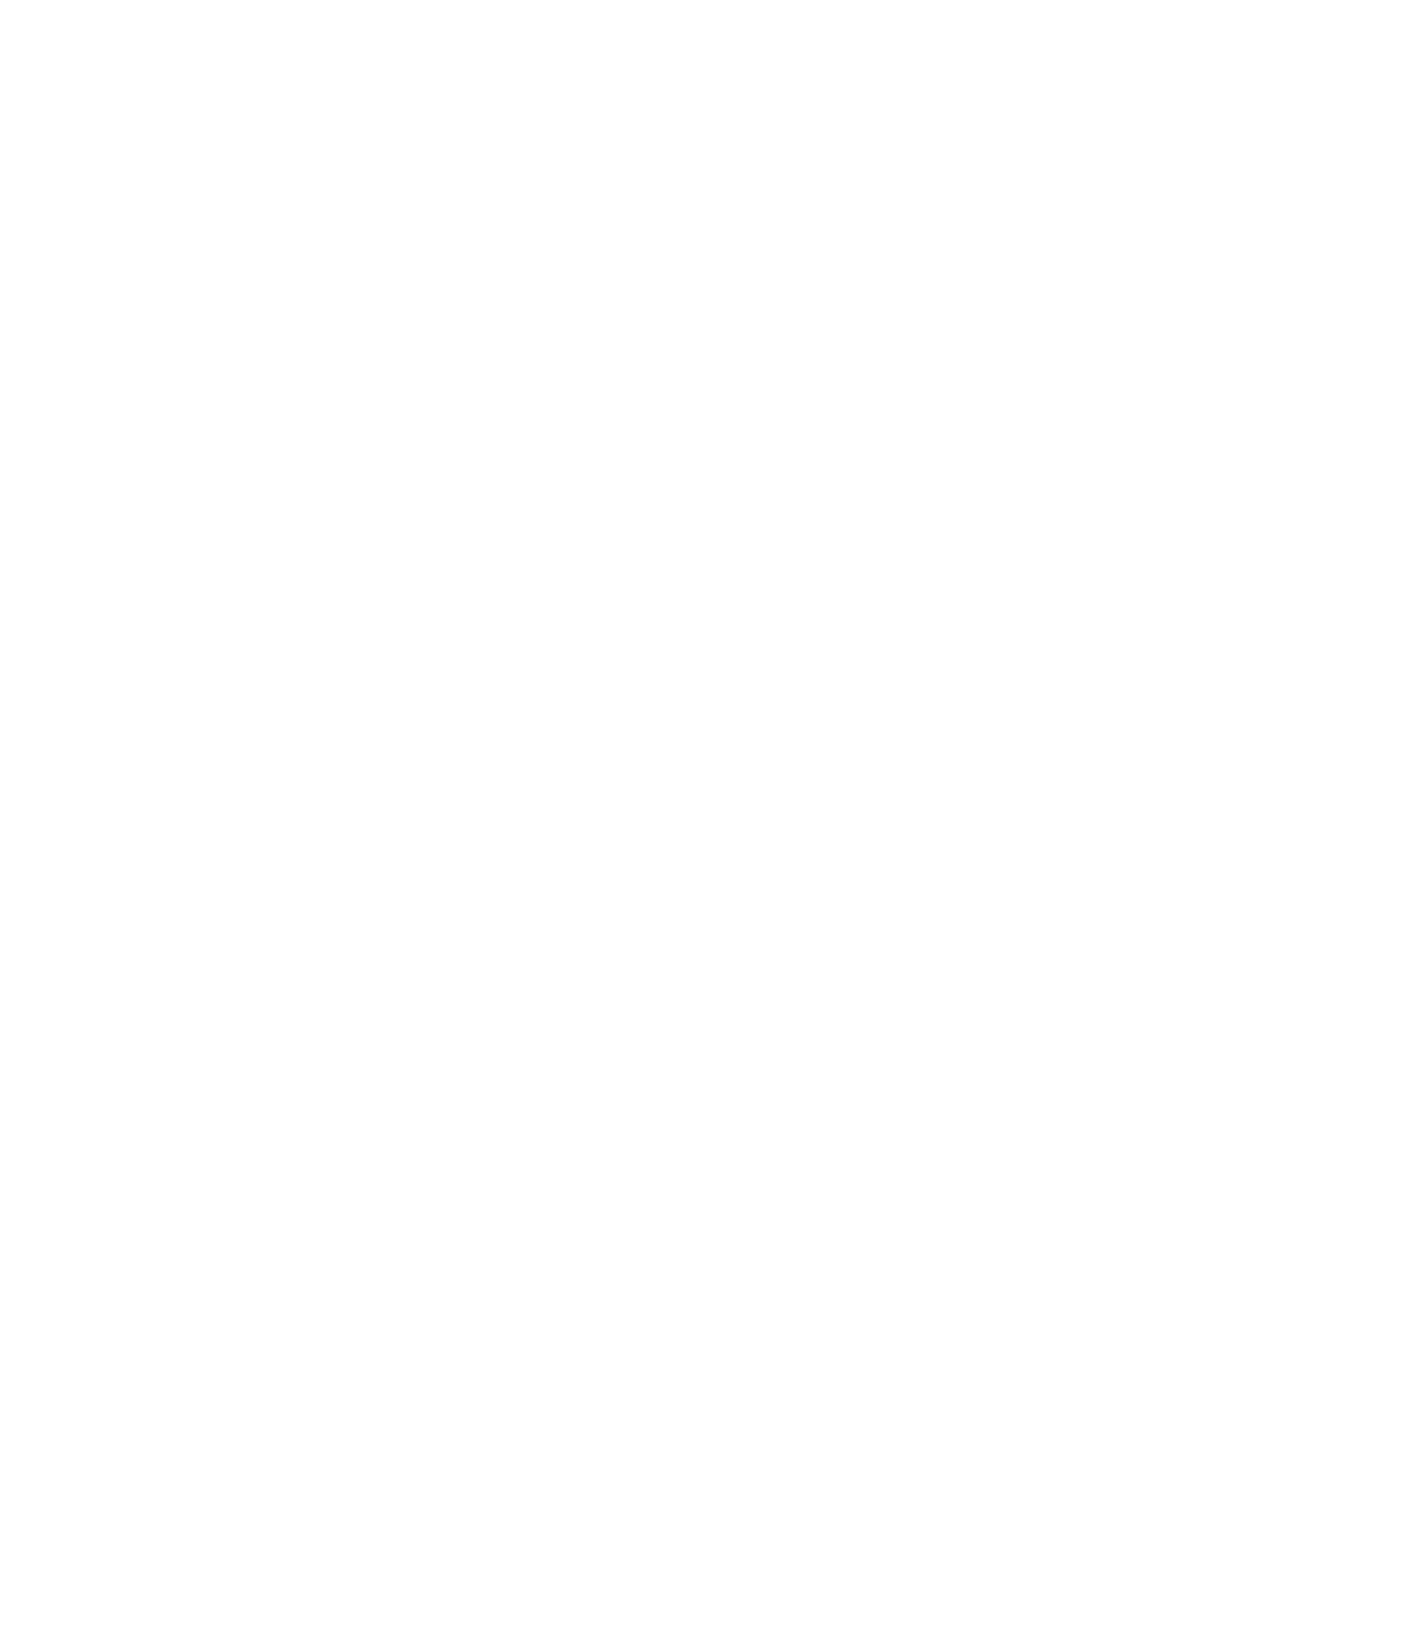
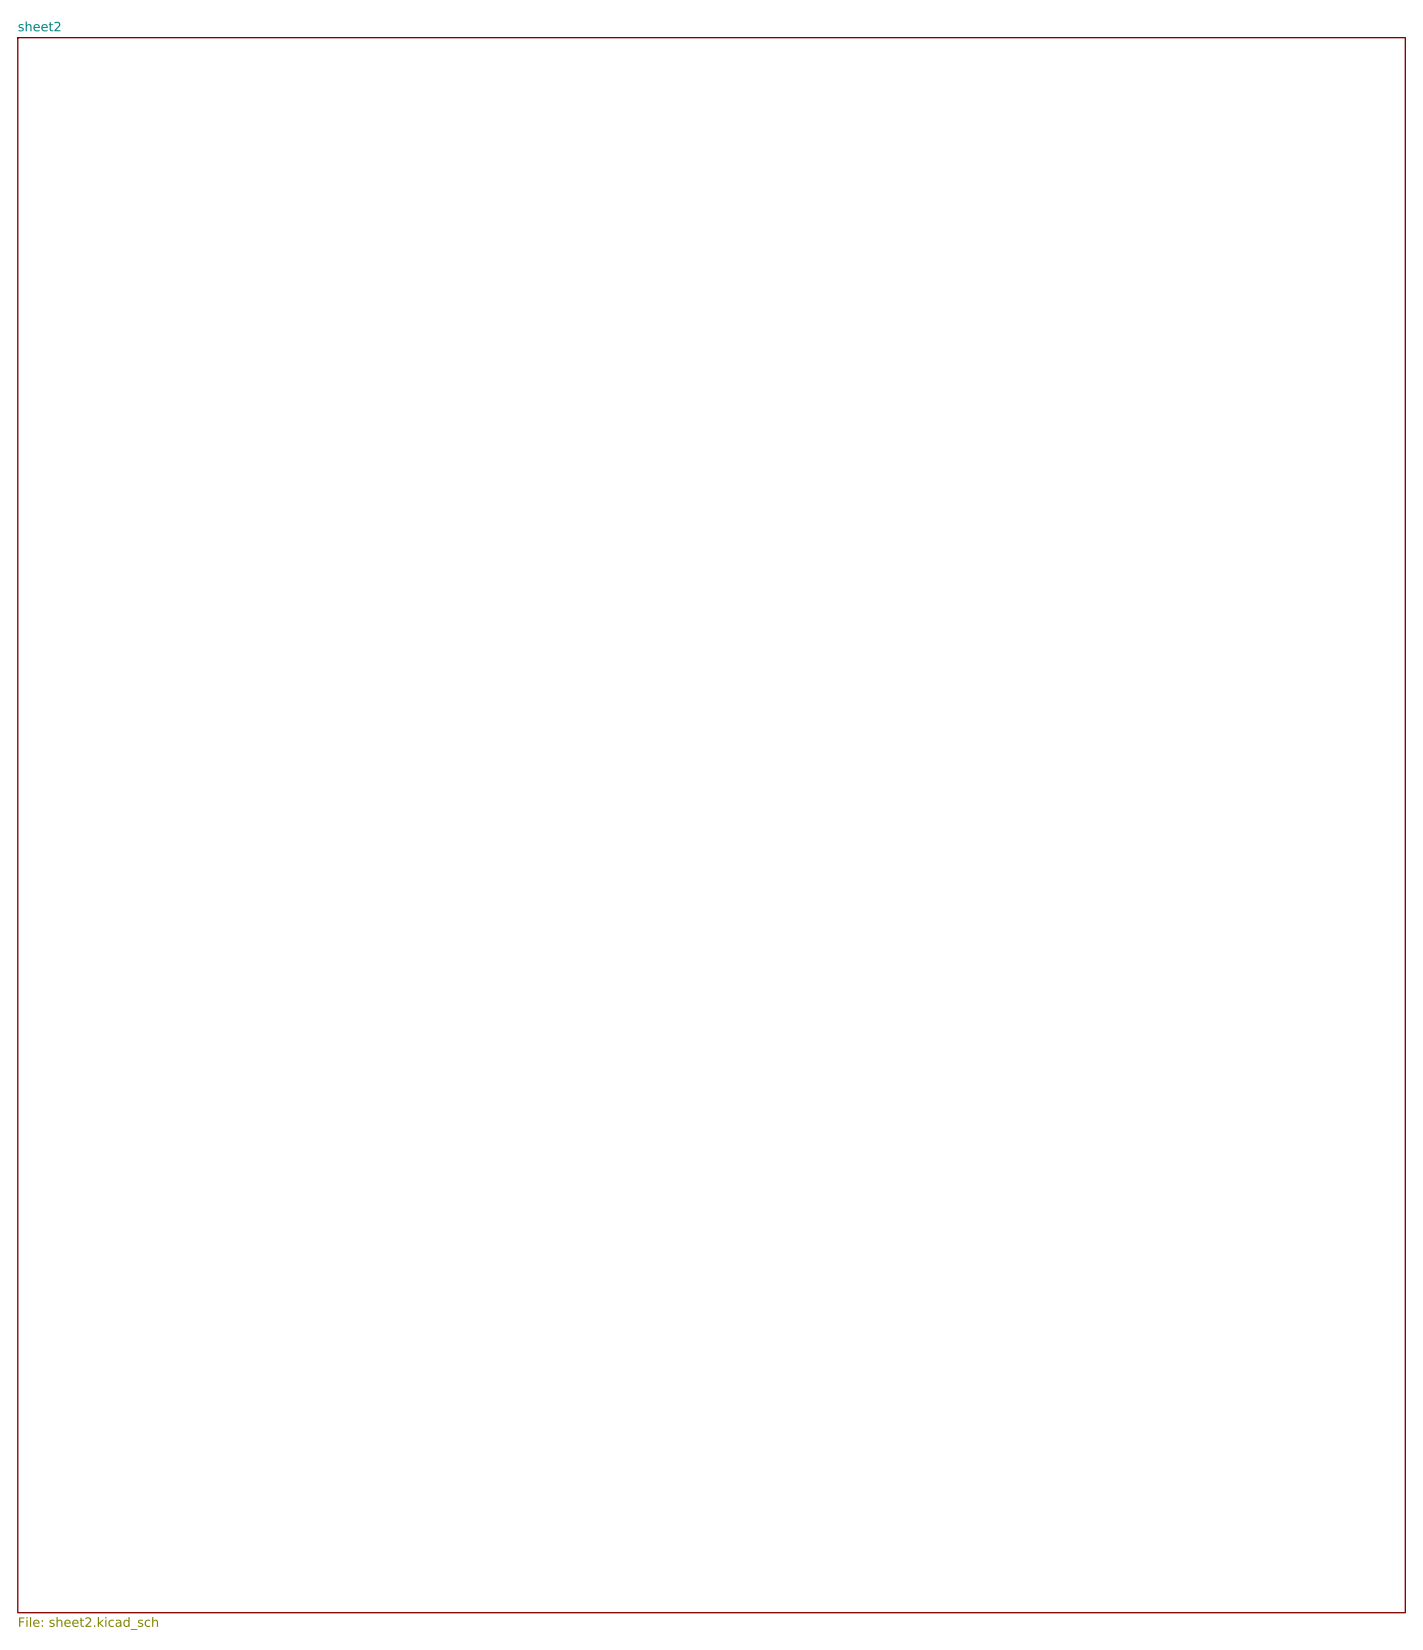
sheet sheet2: none -> File: sheet2.kicad_sch (711, 825)

